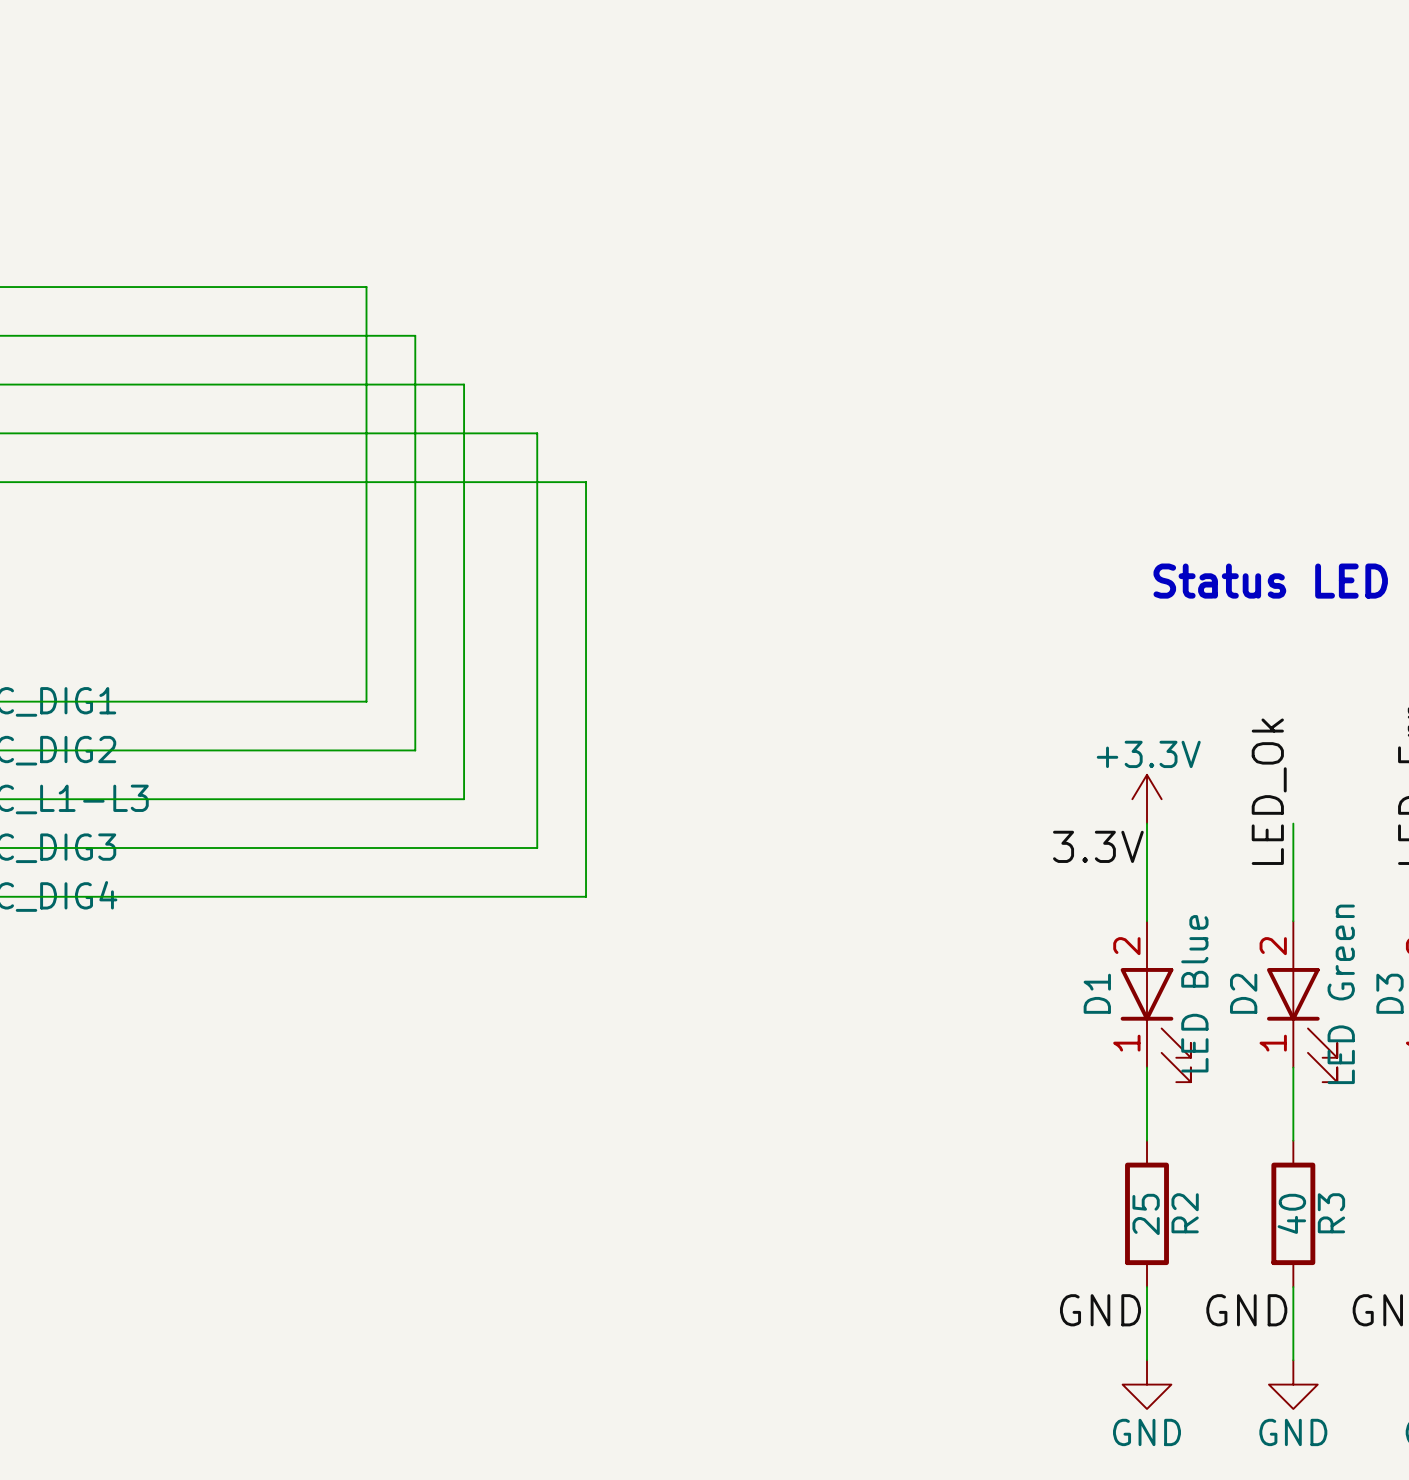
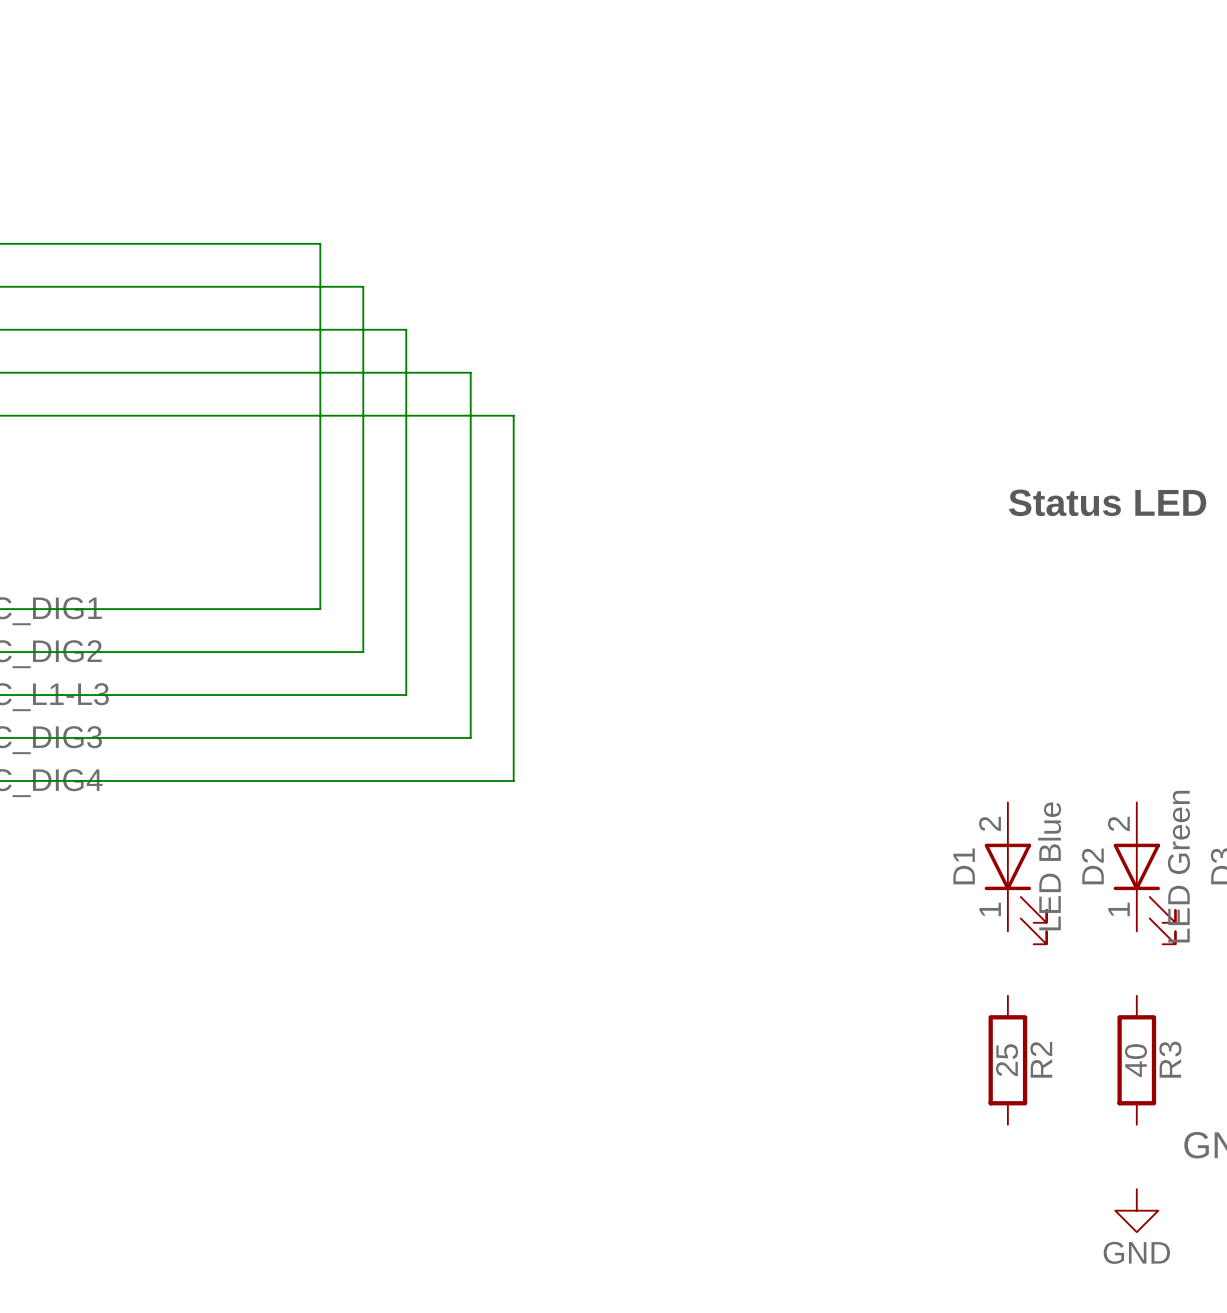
label: LED_Ok (1269, 791) -> none
power symbol: +3.3V (1147, 799) -> none
wire: (1147, 823) (1147, 921) -> none
wire: (1293, 823) (1293, 921) -> none
label: 3.3V (1098, 846) -> none
wire: (1147, 1067) (1147, 1140) -> none
wire: (1293, 1067) (1293, 1140) -> none
wire: (1147, 1287) (1147, 1360) -> none
wire: (1293, 1287) (1293, 1360) -> none
label: GND (1100, 1310) -> none
label: GND (1246, 1310) -> none
power symbol: GND (1147, 1384) -> none

